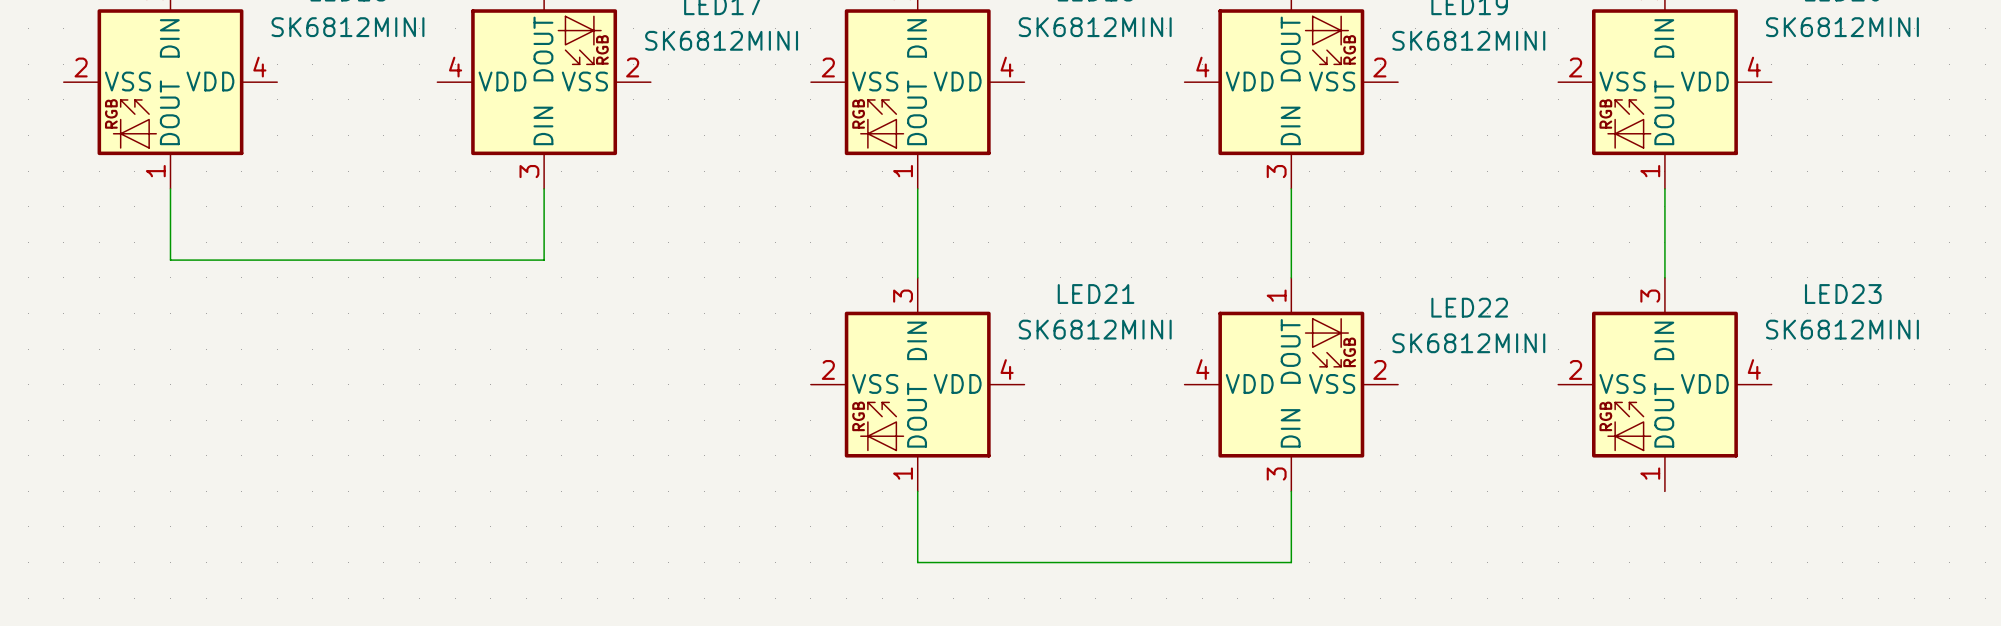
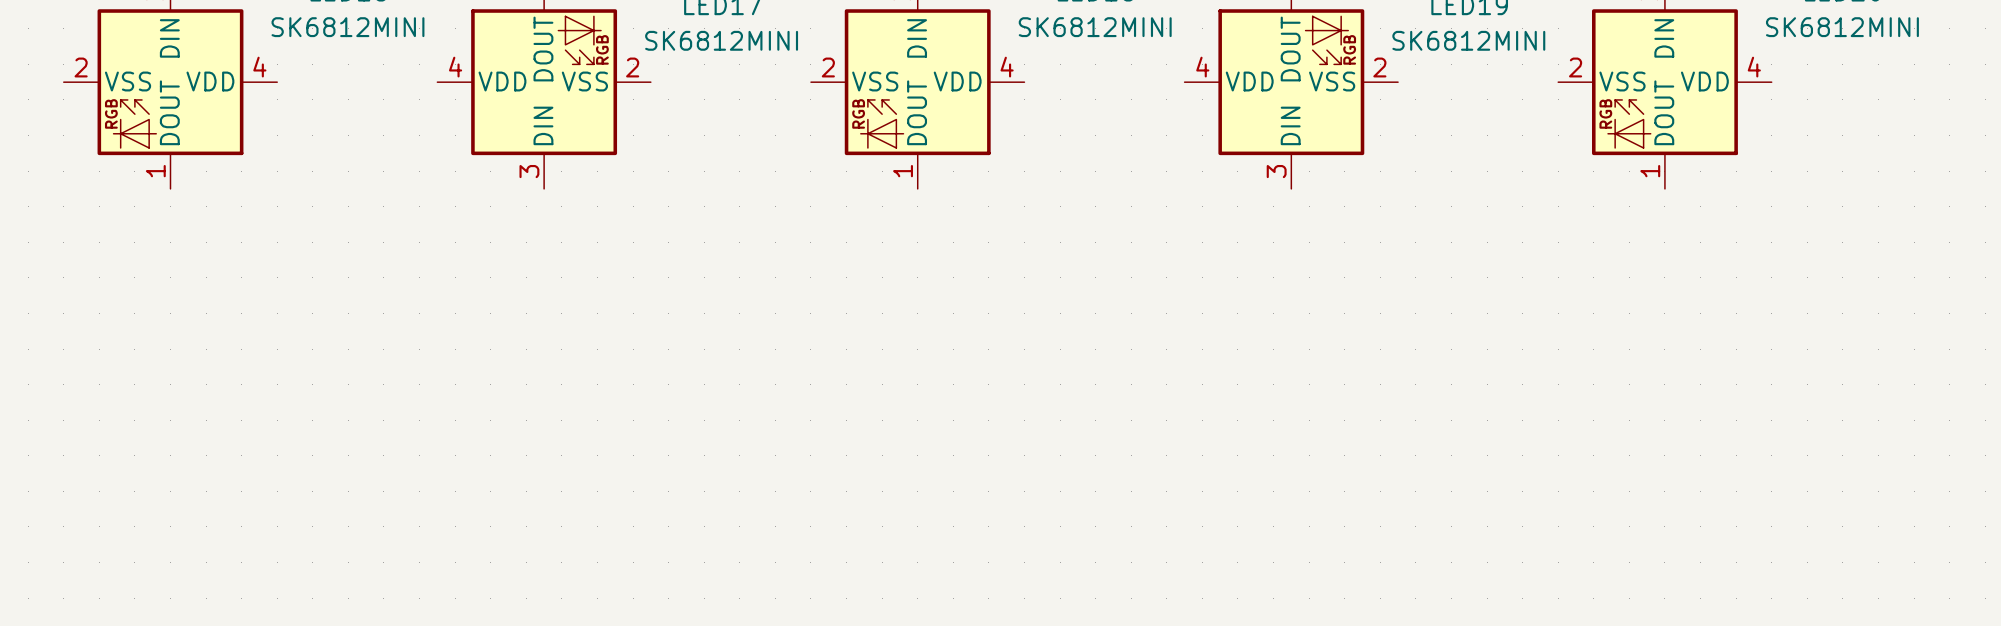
wire: (170, 188) (170, 260) (544, 260) (544, 188) -> none
wire: (917, 188) (917, 277) -> none
wire: (1291, 188) (1291, 277) -> none
wire: (1664, 188) (1664, 277) -> none
LED21: SK6812MINI (917, 384) -> none
LED22: SK6812MINI (1291, 384) -> none
LED23: SK6812MINI (1664, 384) -> none
wire: (917, 491) (917, 562) (1291, 562) (1291, 491) -> none

